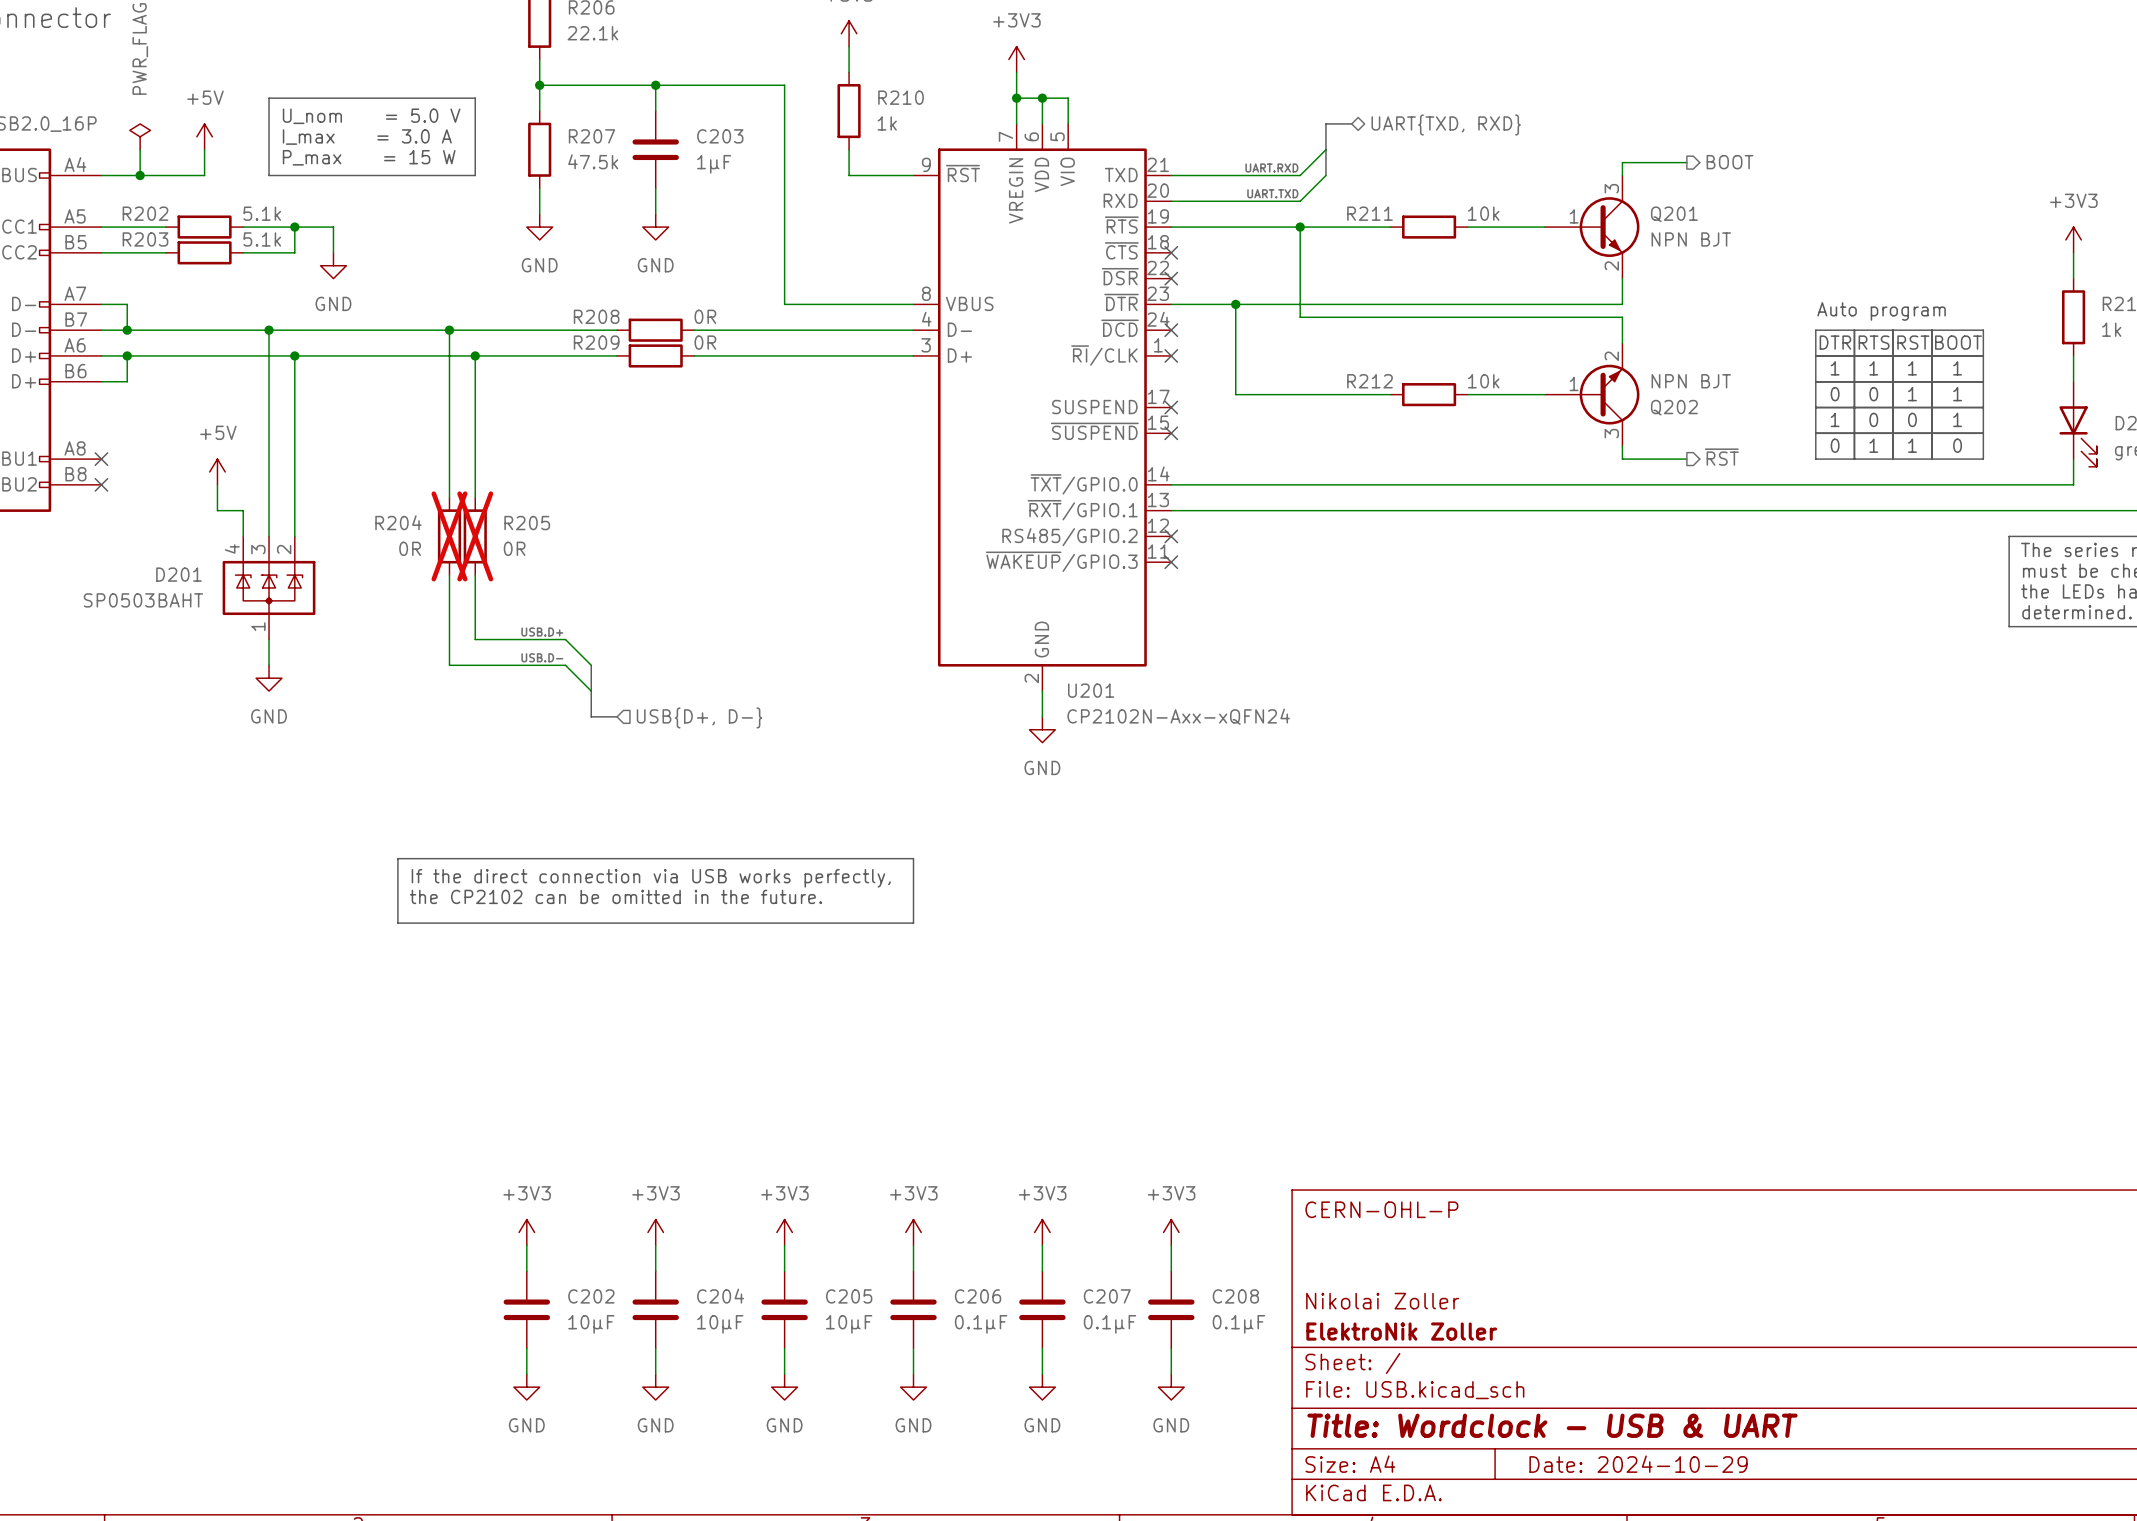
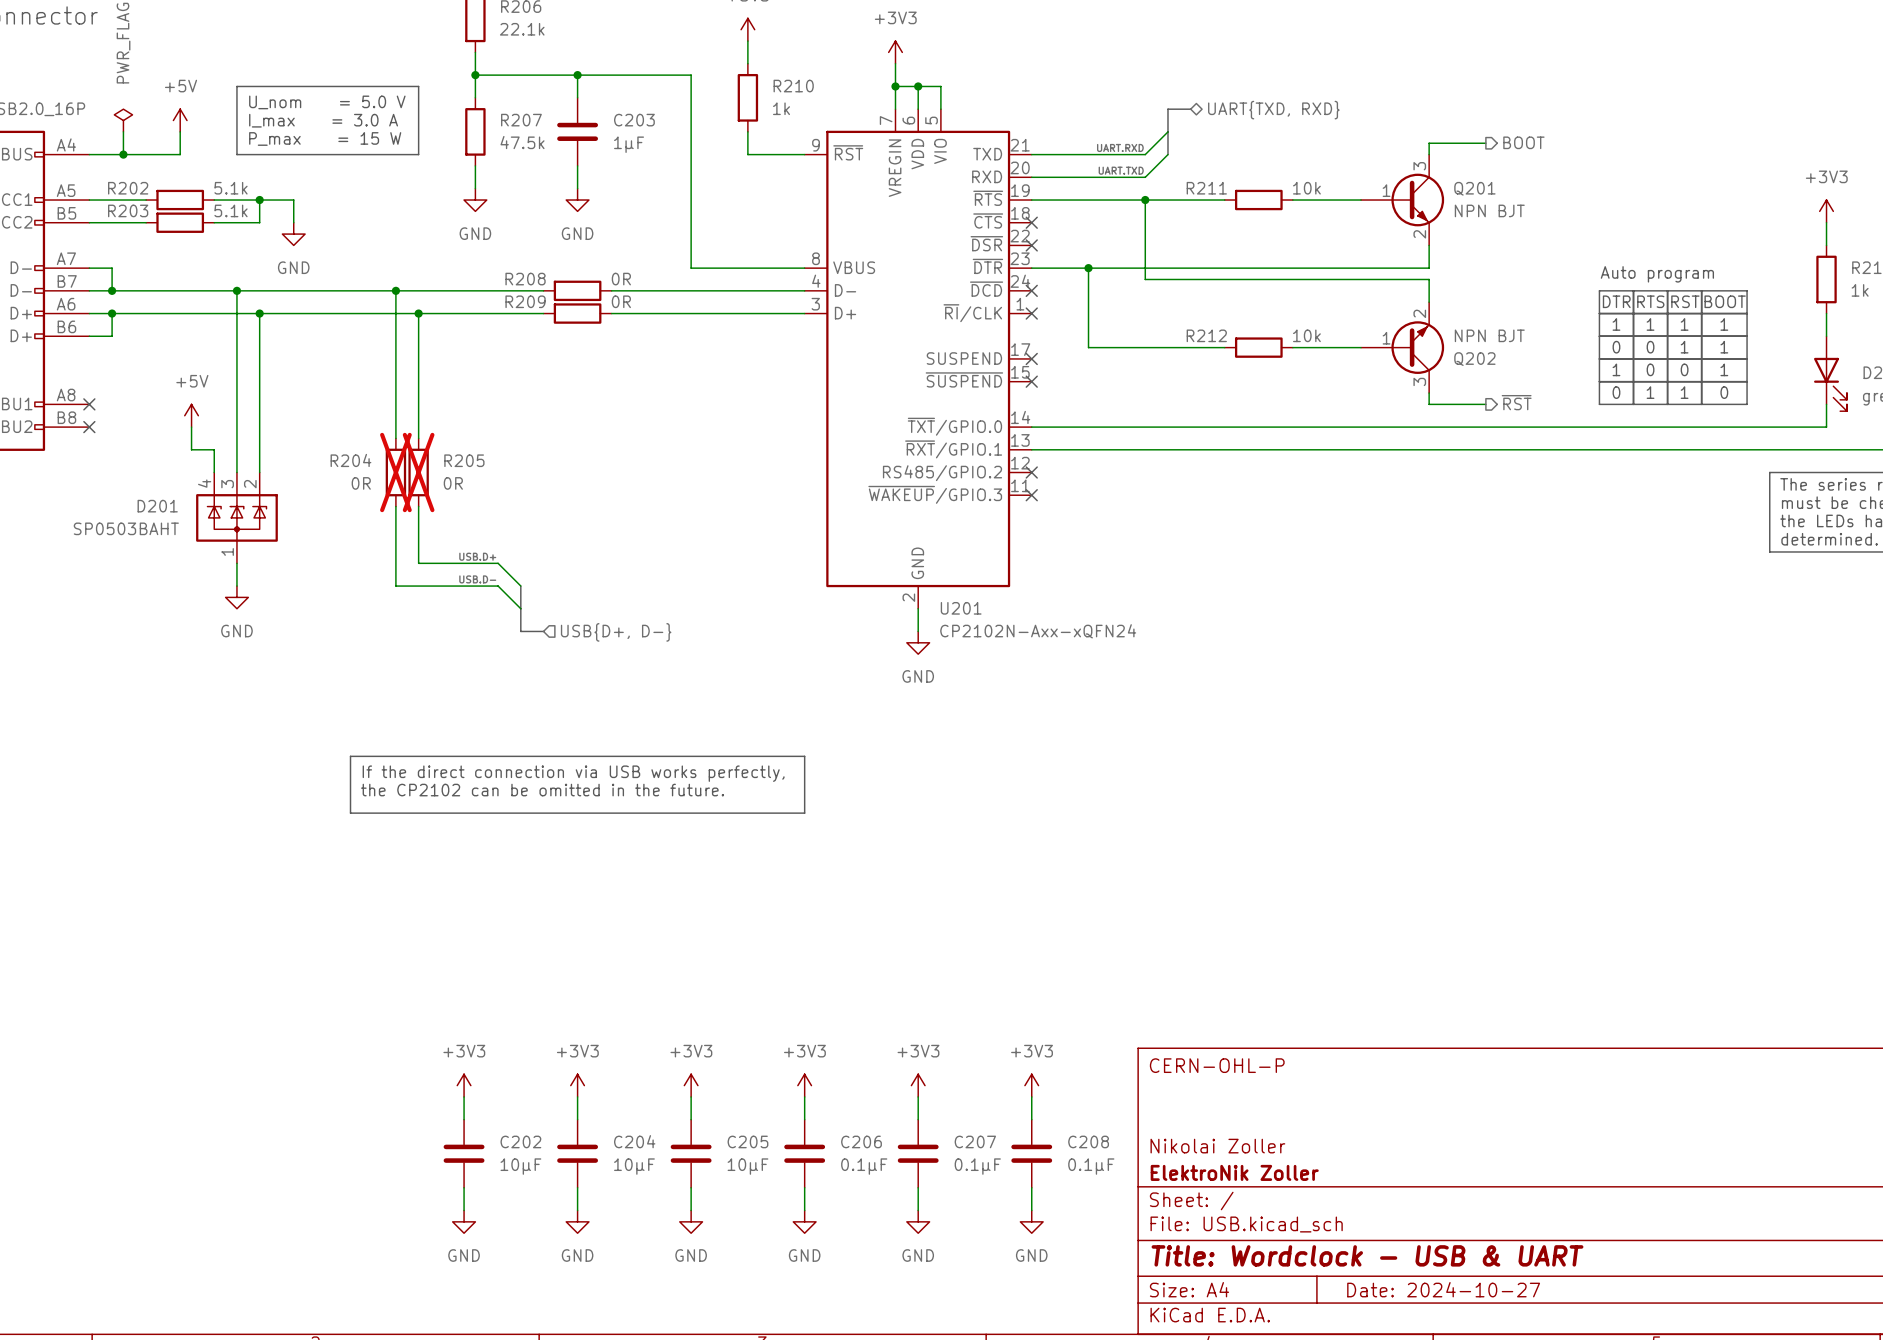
title block: Date: 2024-10-29 (1638, 1464) -> Date: 2024-10-27 (1443, 1289)

